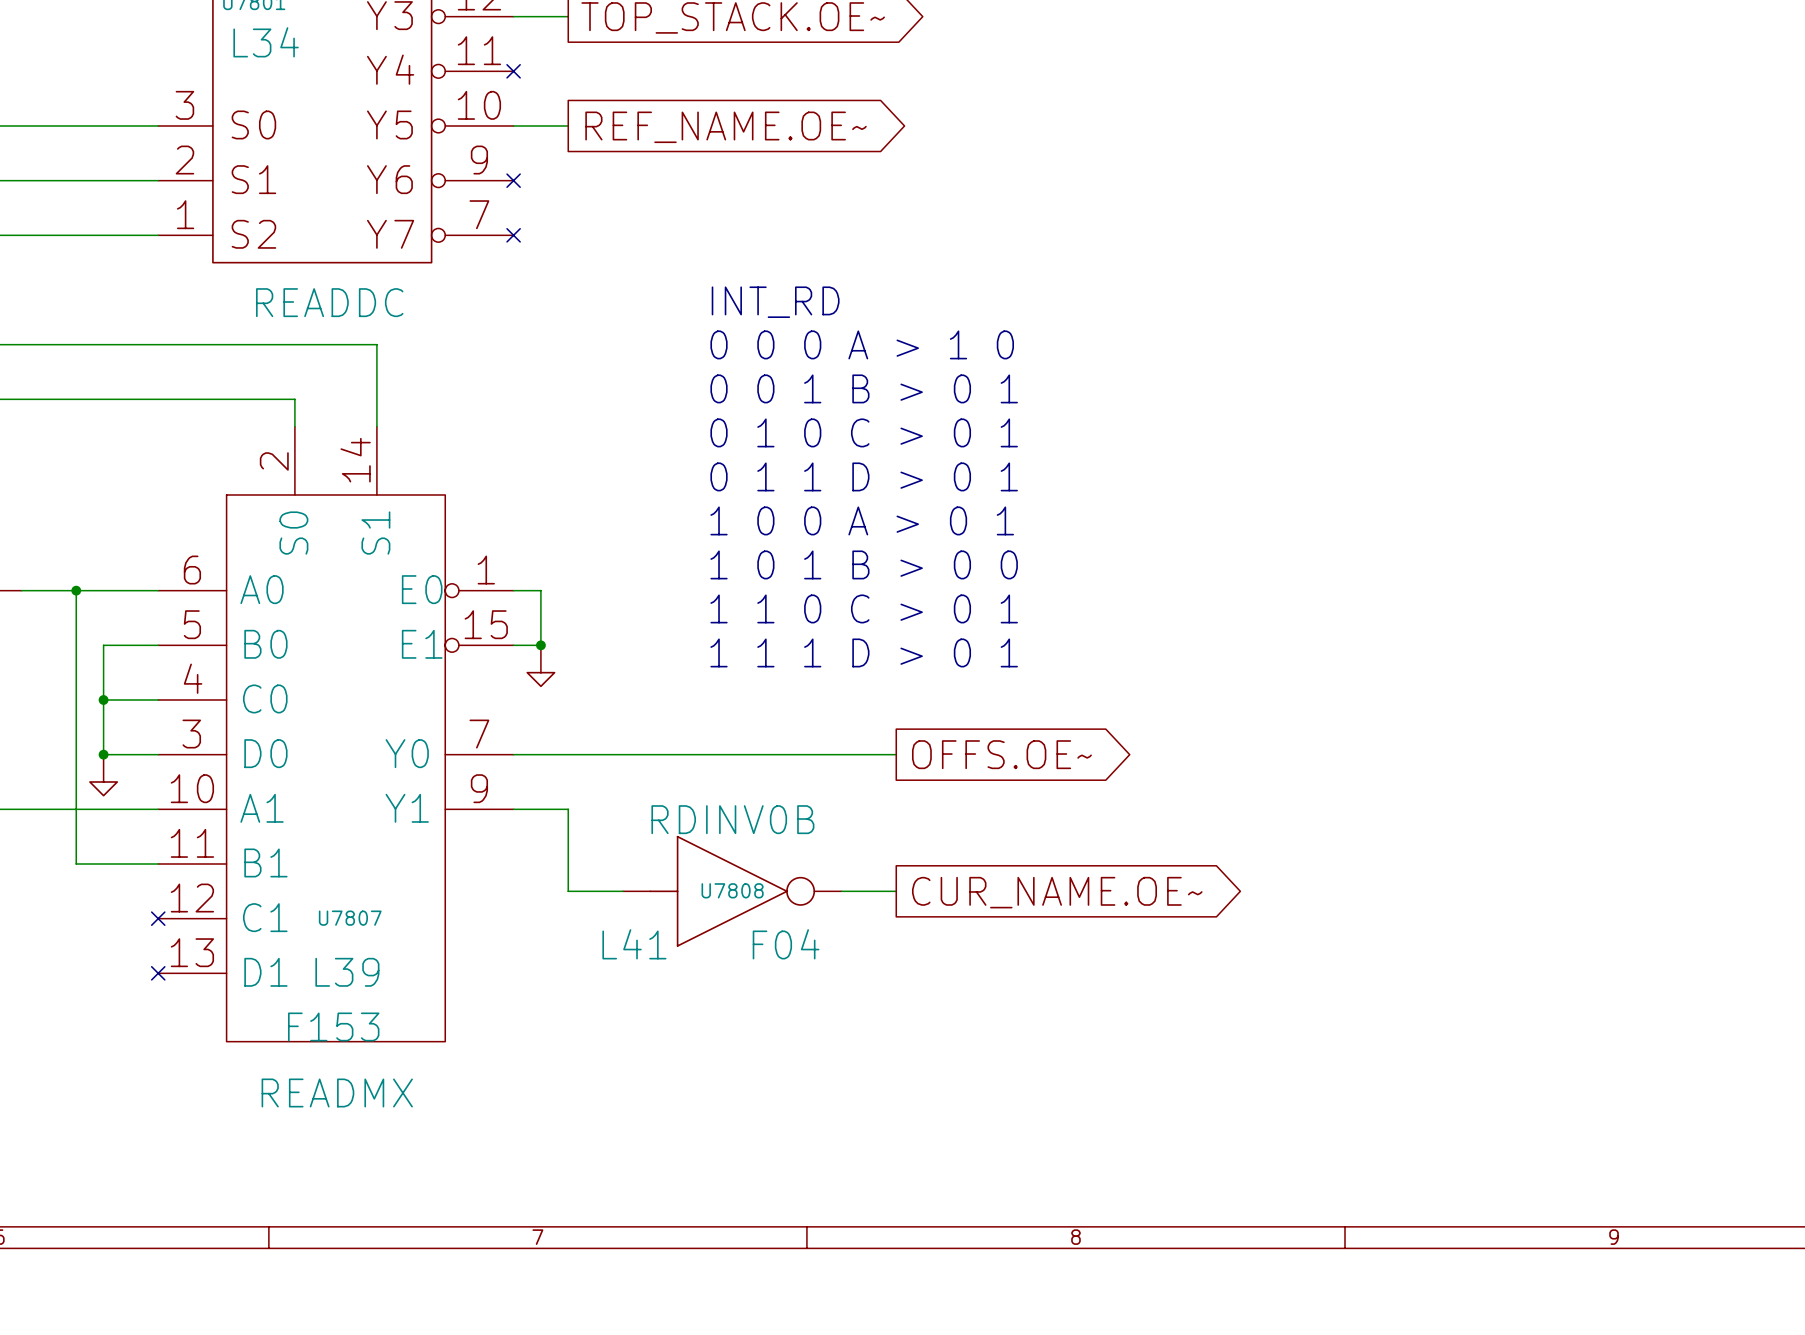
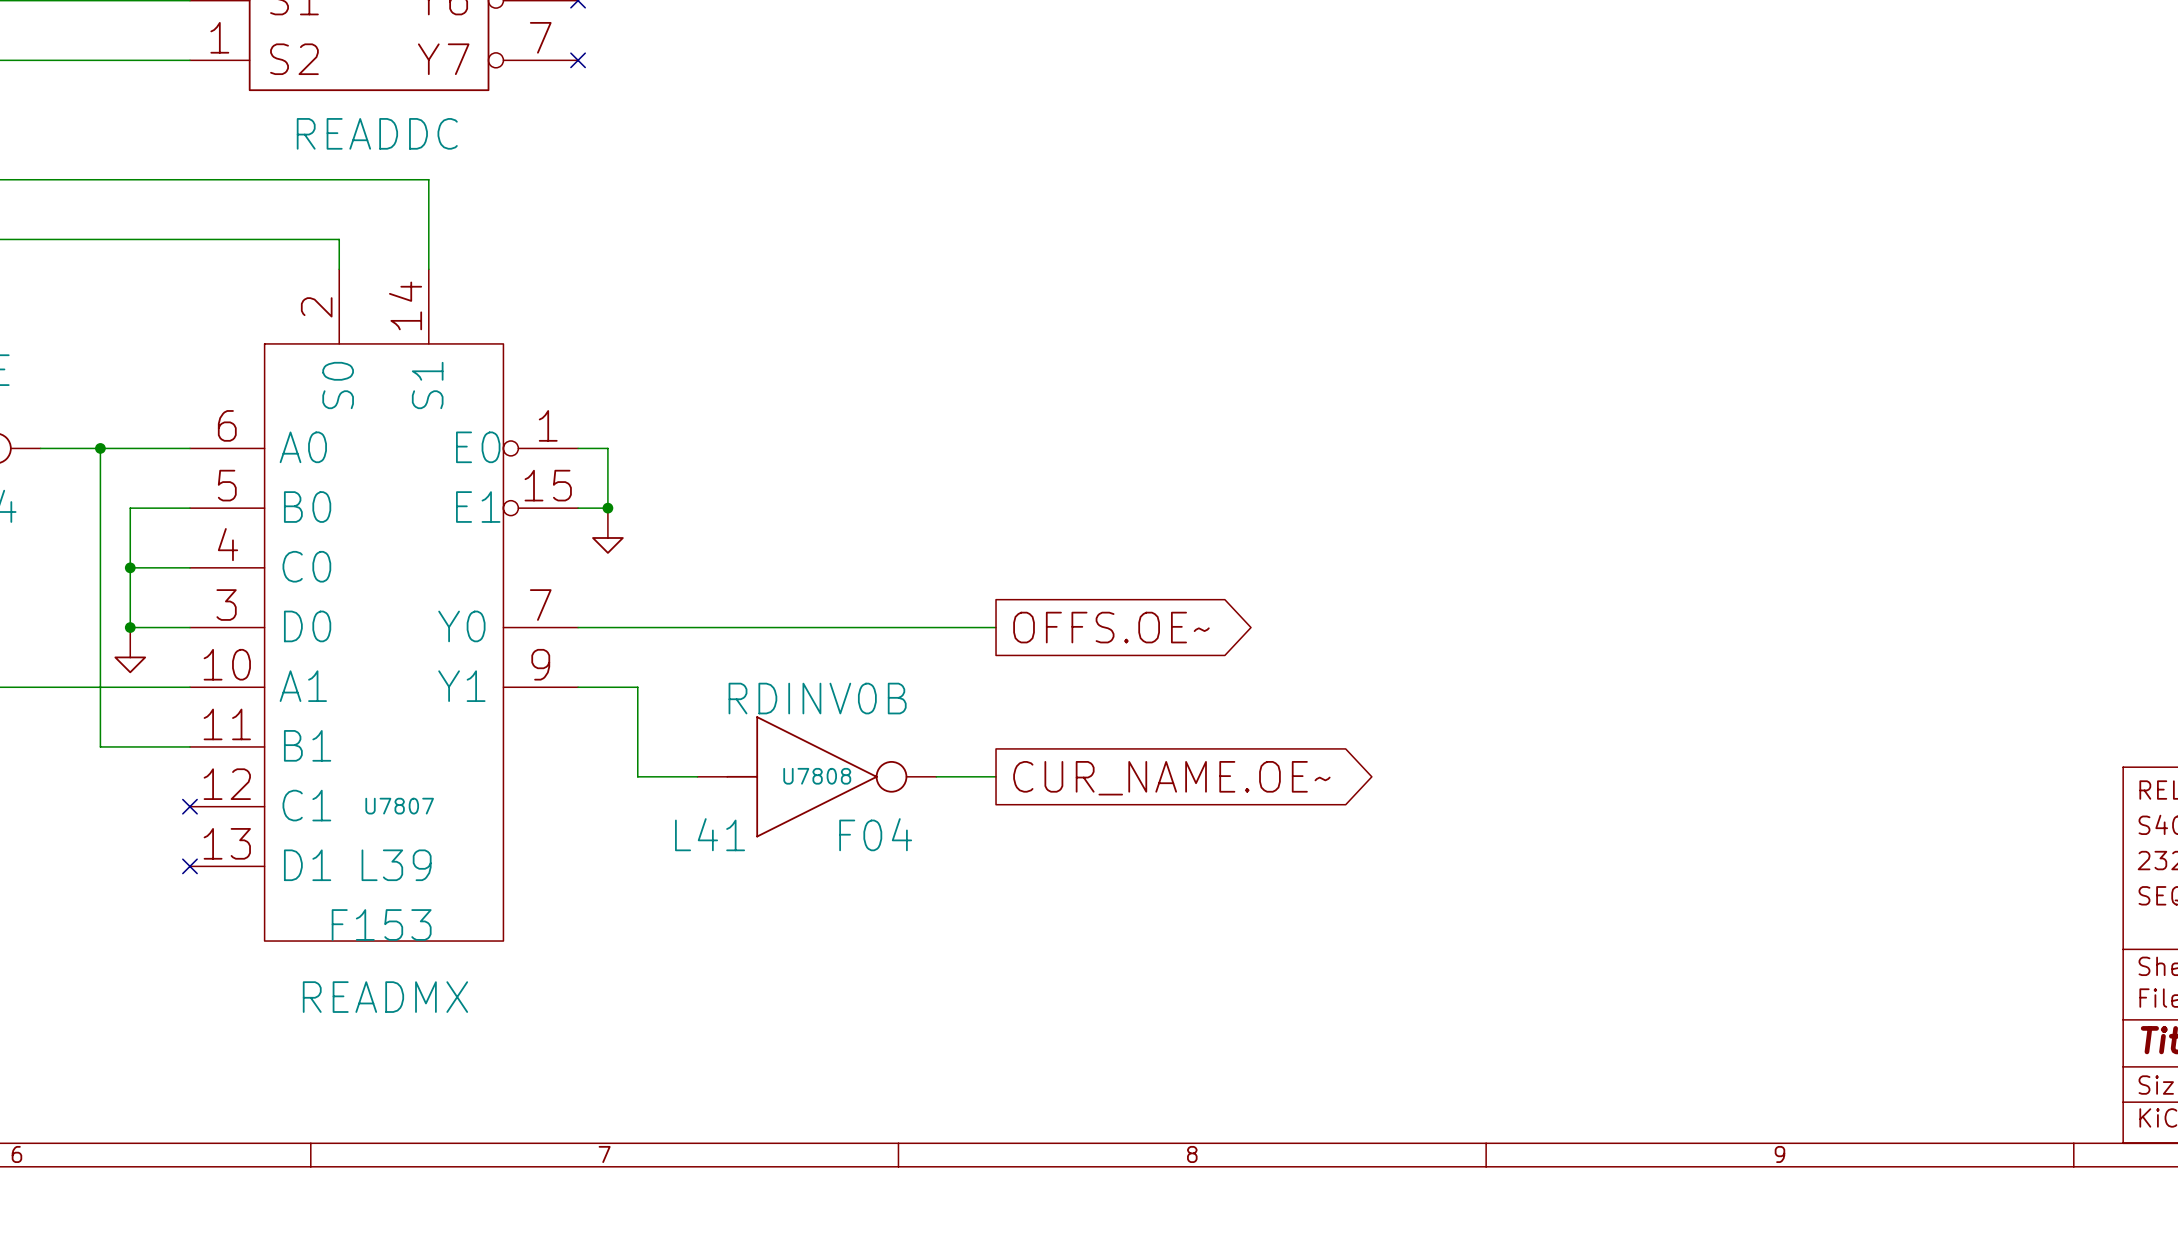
text: INT_RD (775, 302) -> none
text: 0 0 0 A > 1 0 (862, 344) -> none
text: 0 0 1 B > 0 1 (864, 388) -> none
text: 0 1 0 C > 0 1 (864, 432) -> none
text: 0 1 1 D > 0 1 (864, 476) -> none
text: 1 0 0 A > 0 1 (862, 520) -> none
text: 1 0 1 B > 0 0 (864, 564) -> none
text: 1 1 0 C > 0 1 (864, 608) -> none
text: 1 1 1 D > 0 1 (864, 652) -> none

